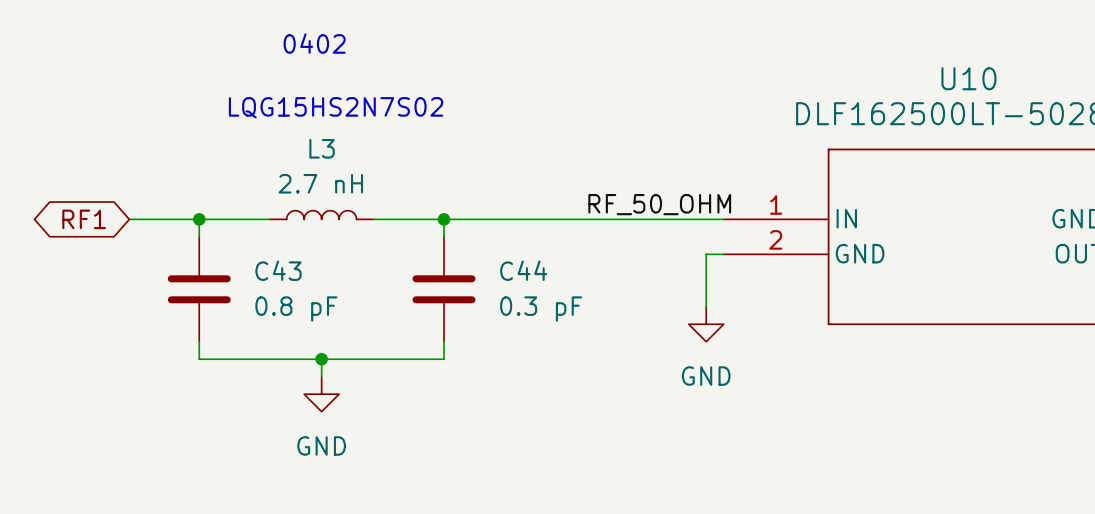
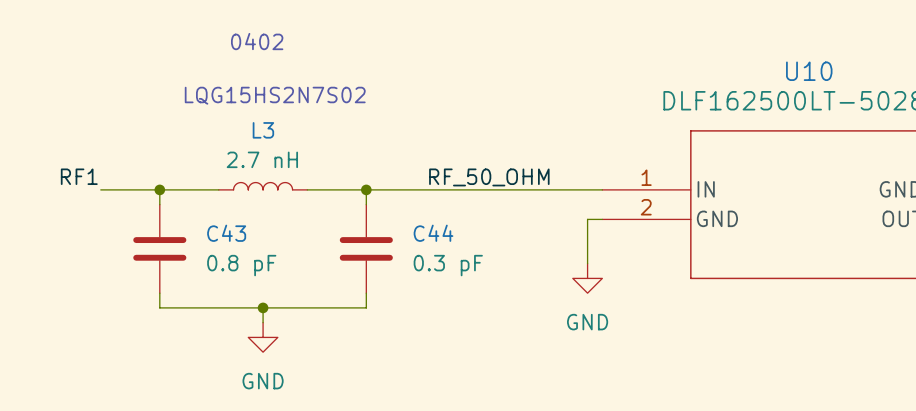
label: none -> RF1 (79, 176)
label position: RF_50_OHM (659, 204) -> RF_50_OHM (489, 177)
global label: RF1 (84, 219) -> none

